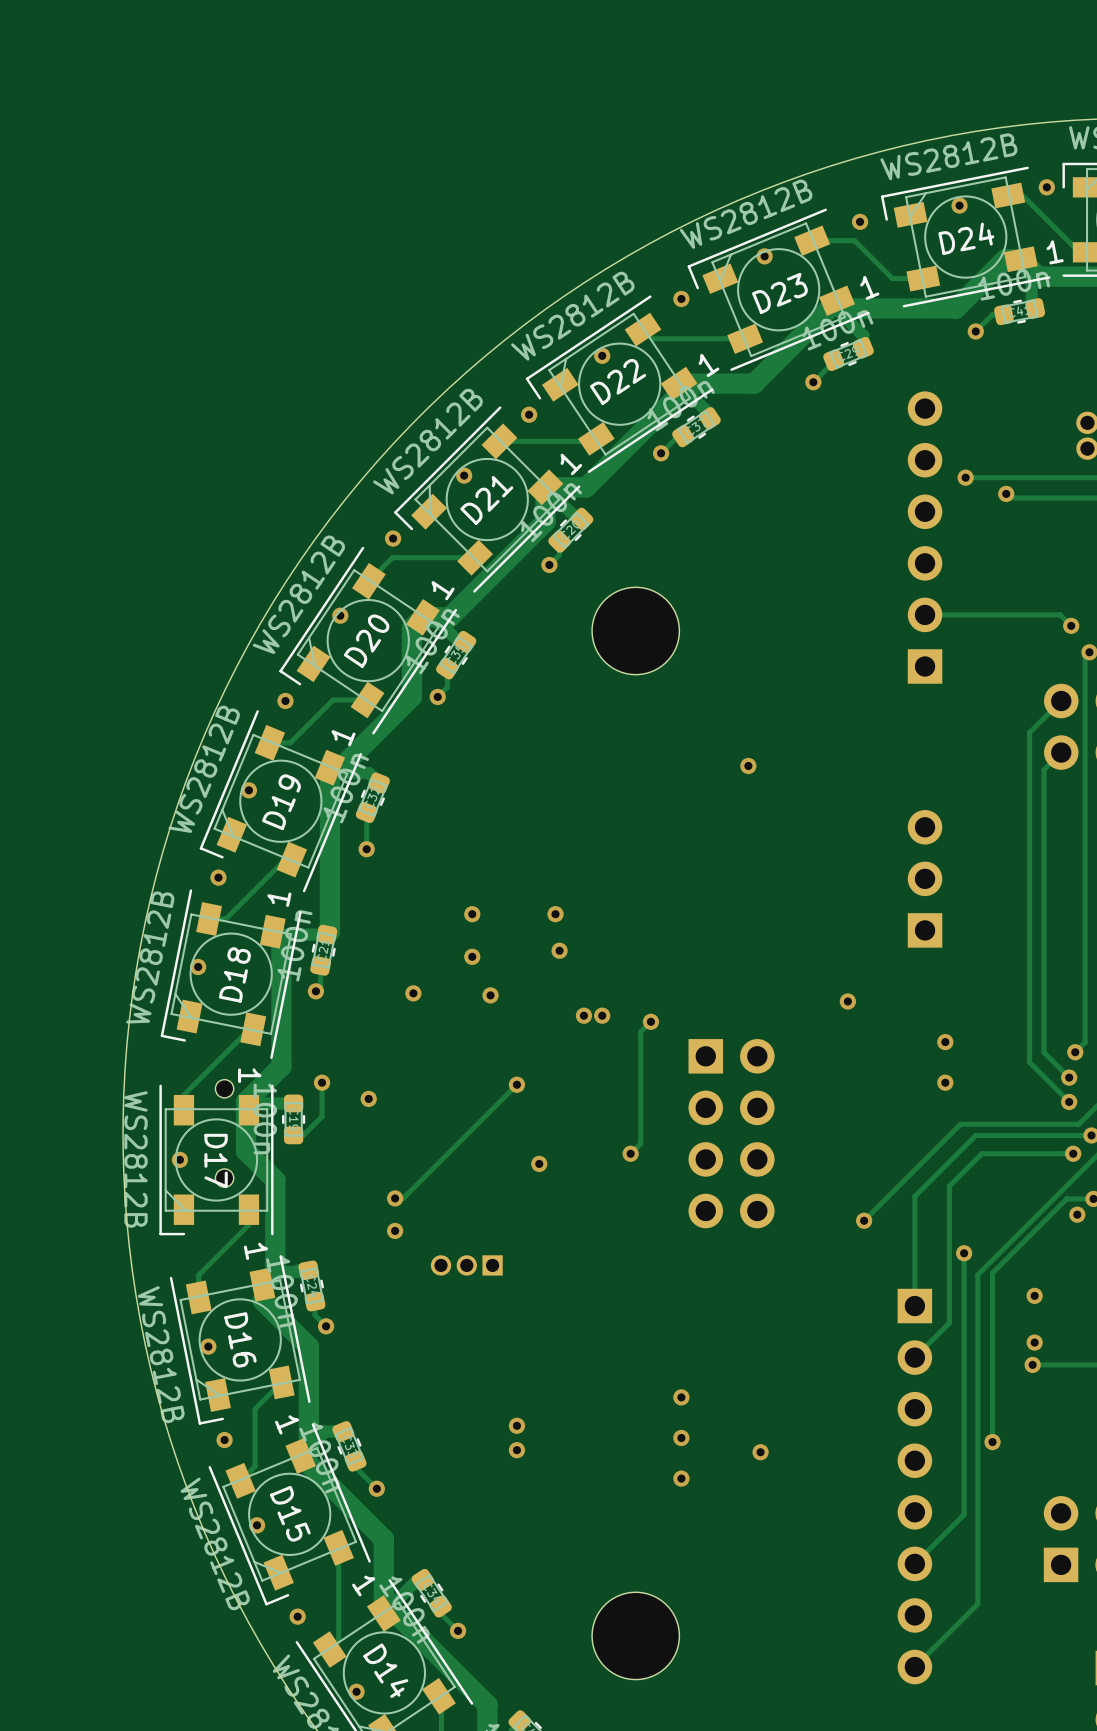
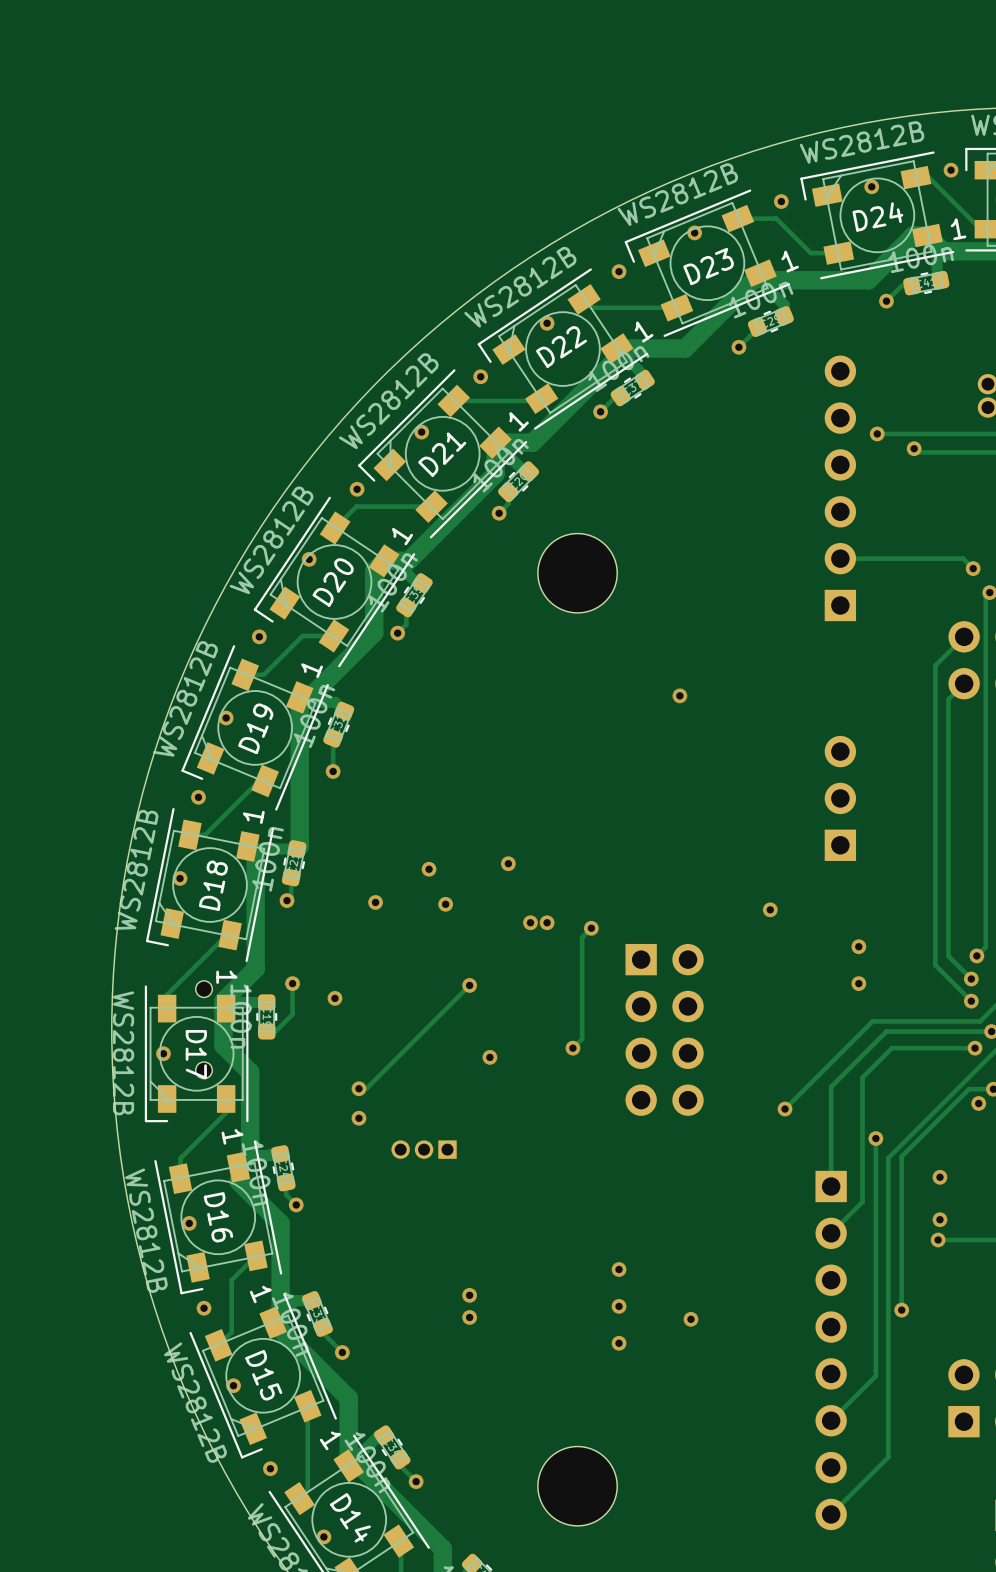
via: (472, 914) -> none
via: (555, 914) -> none

